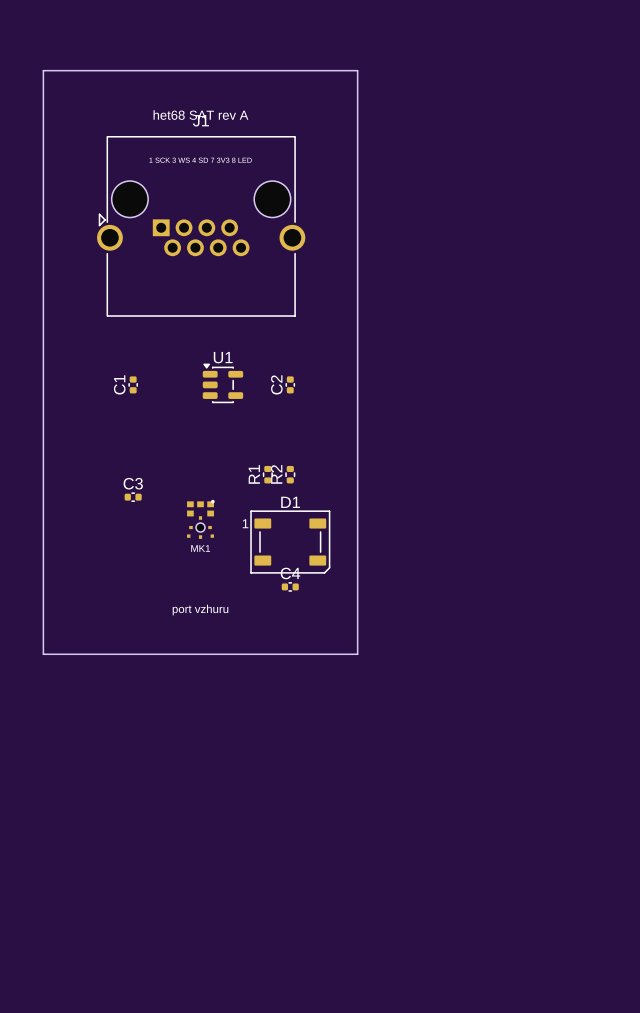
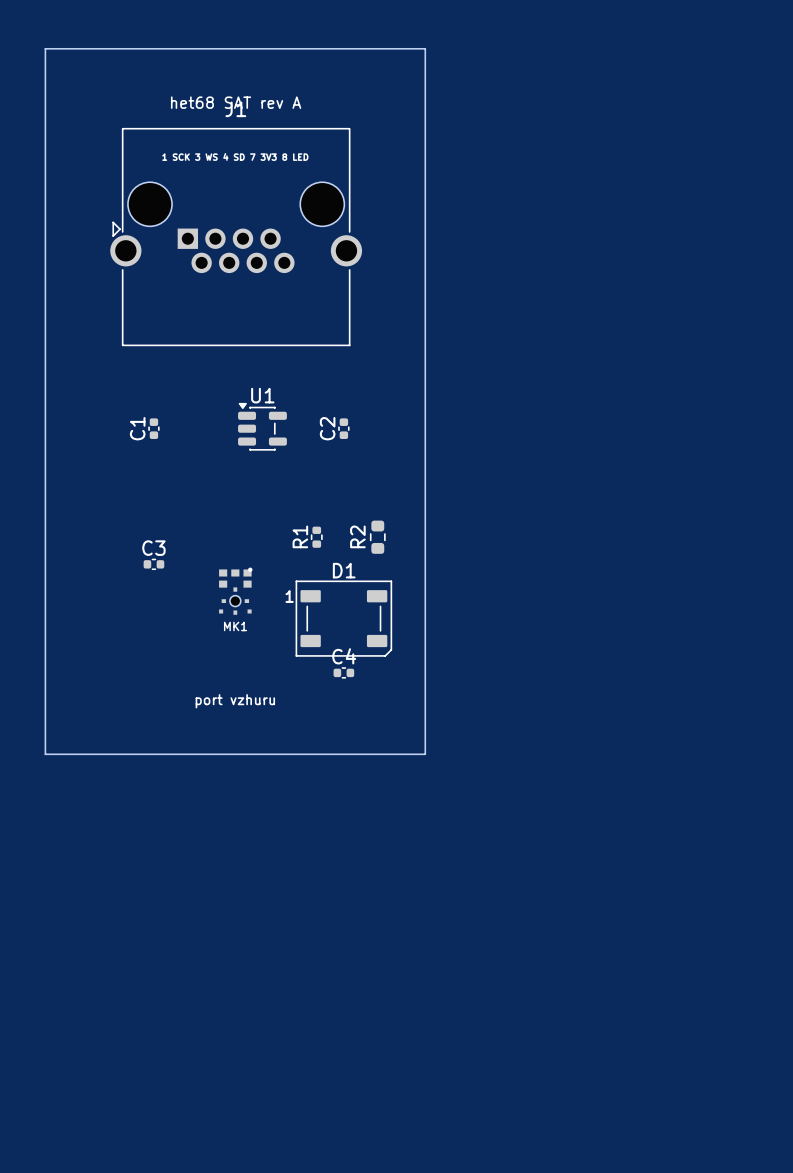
R2 footprint: [285, 465, 296, 484] -> [369, 520, 386, 554]

